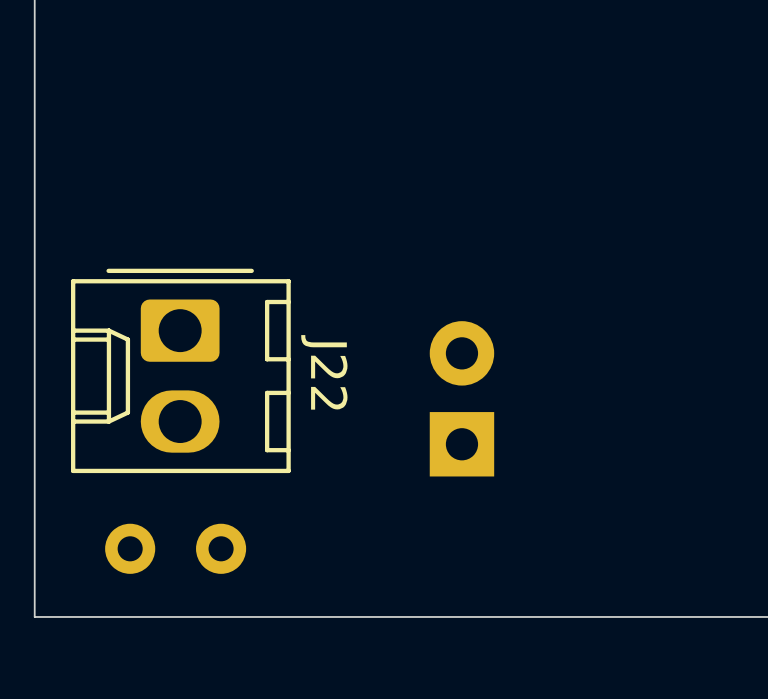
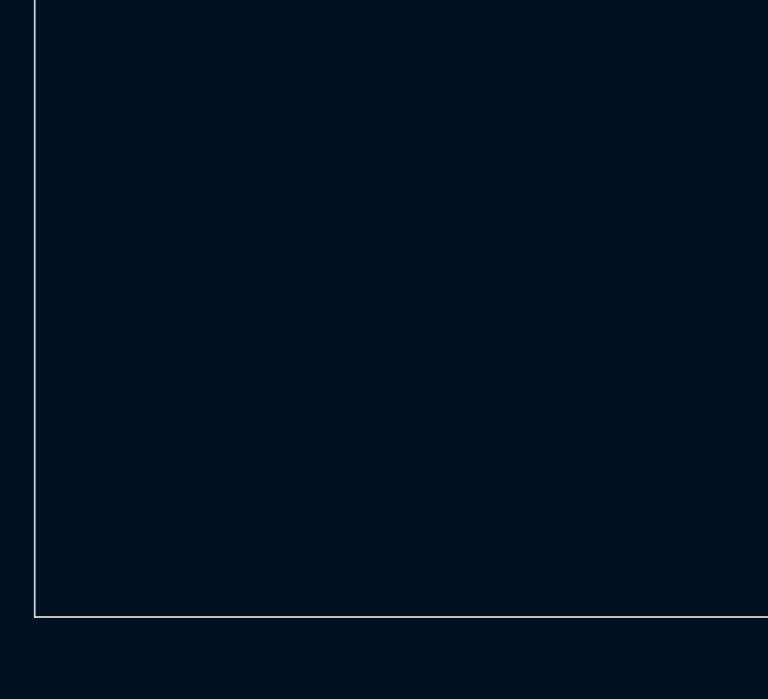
J22: (180, 370) -> none
part: (461, 398) -> none
part: (175, 548) -> none

